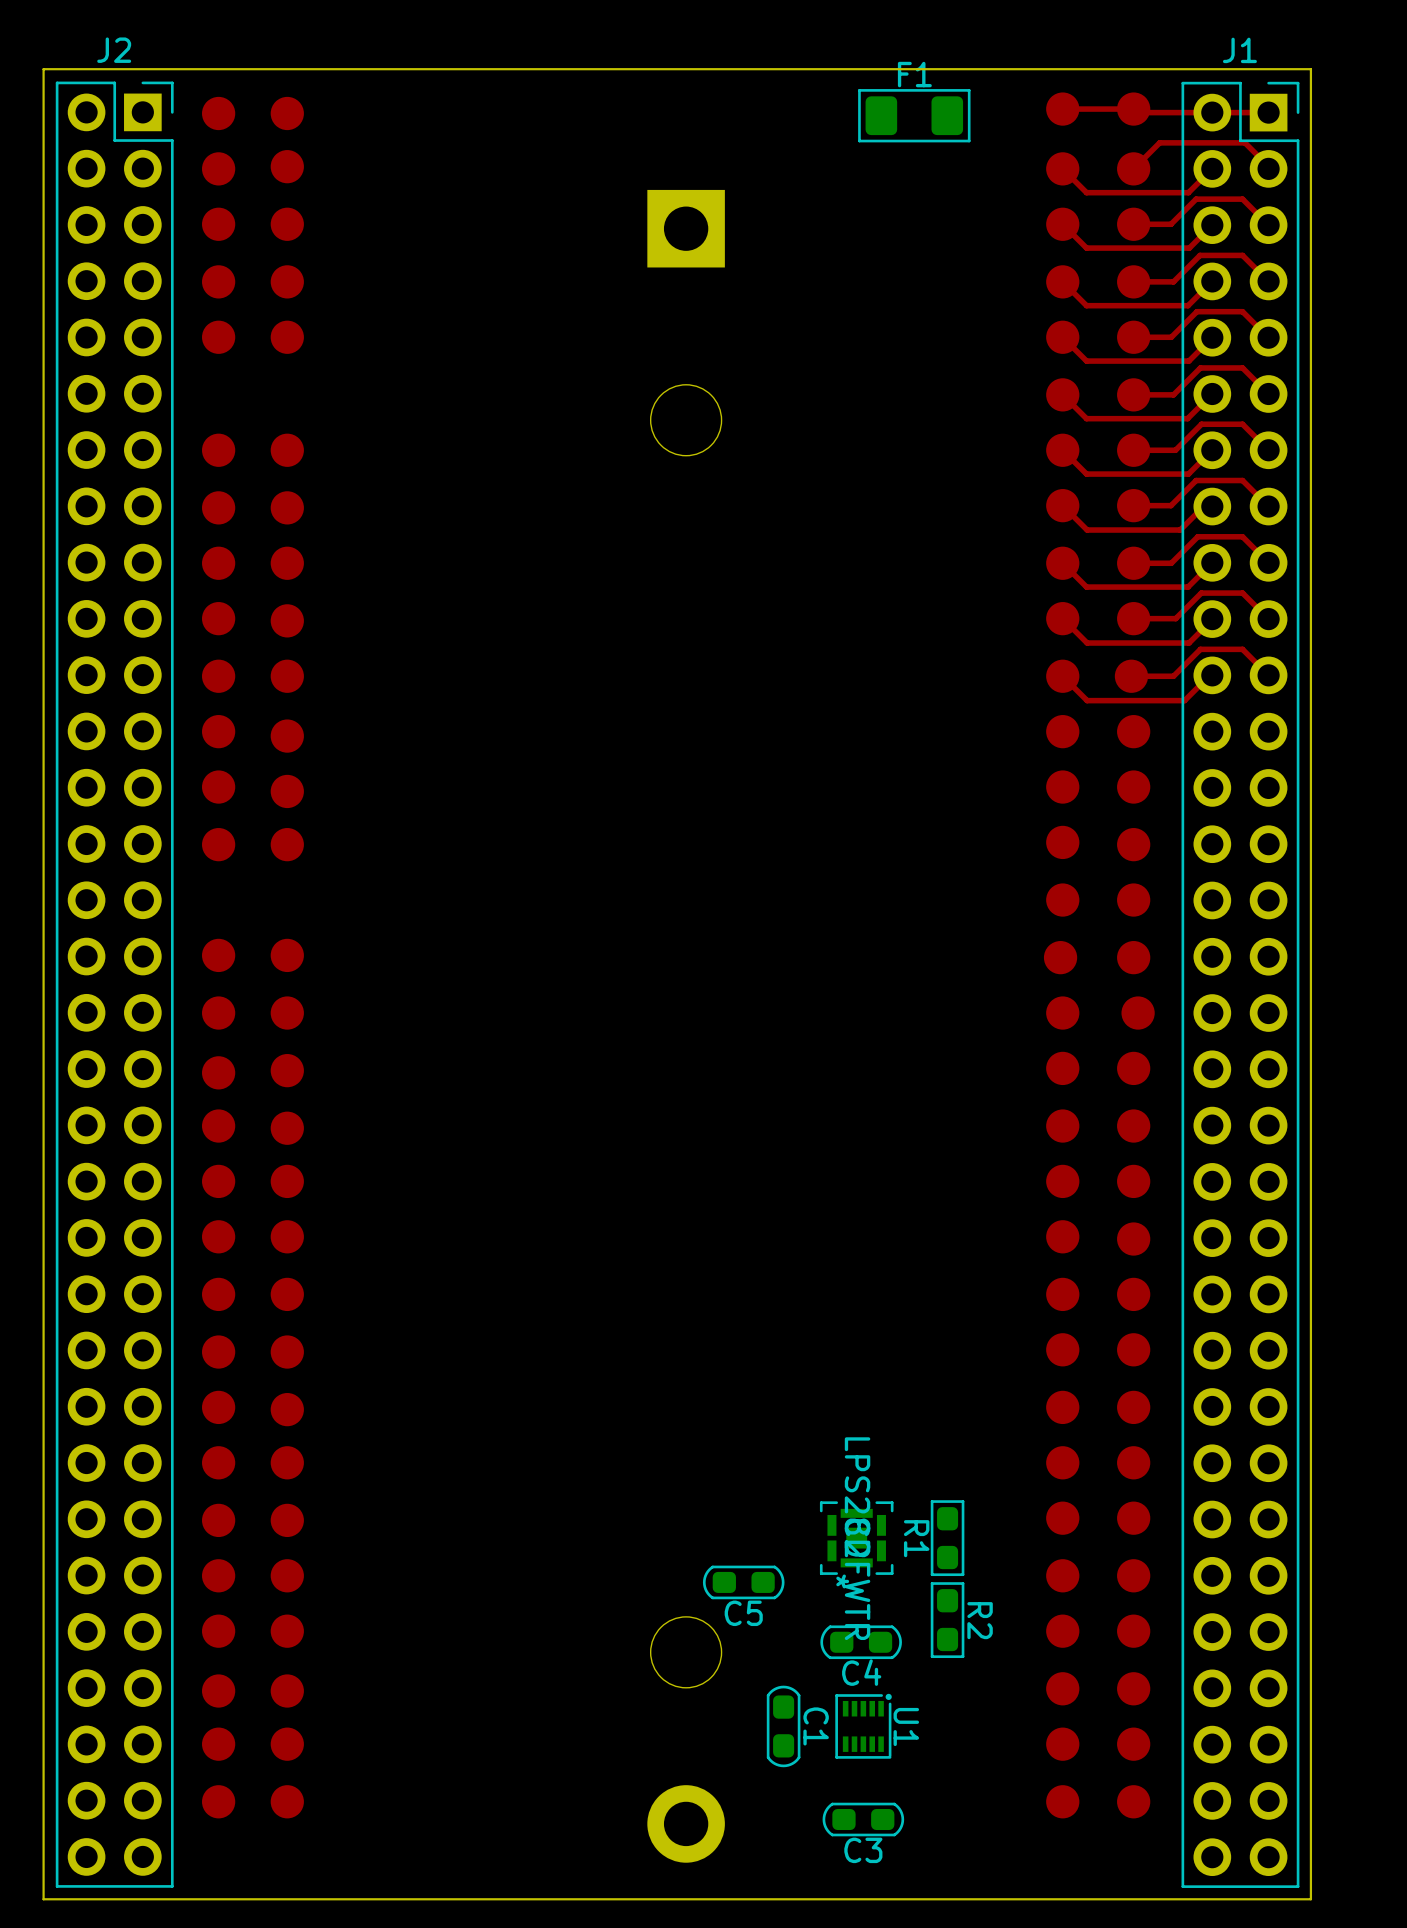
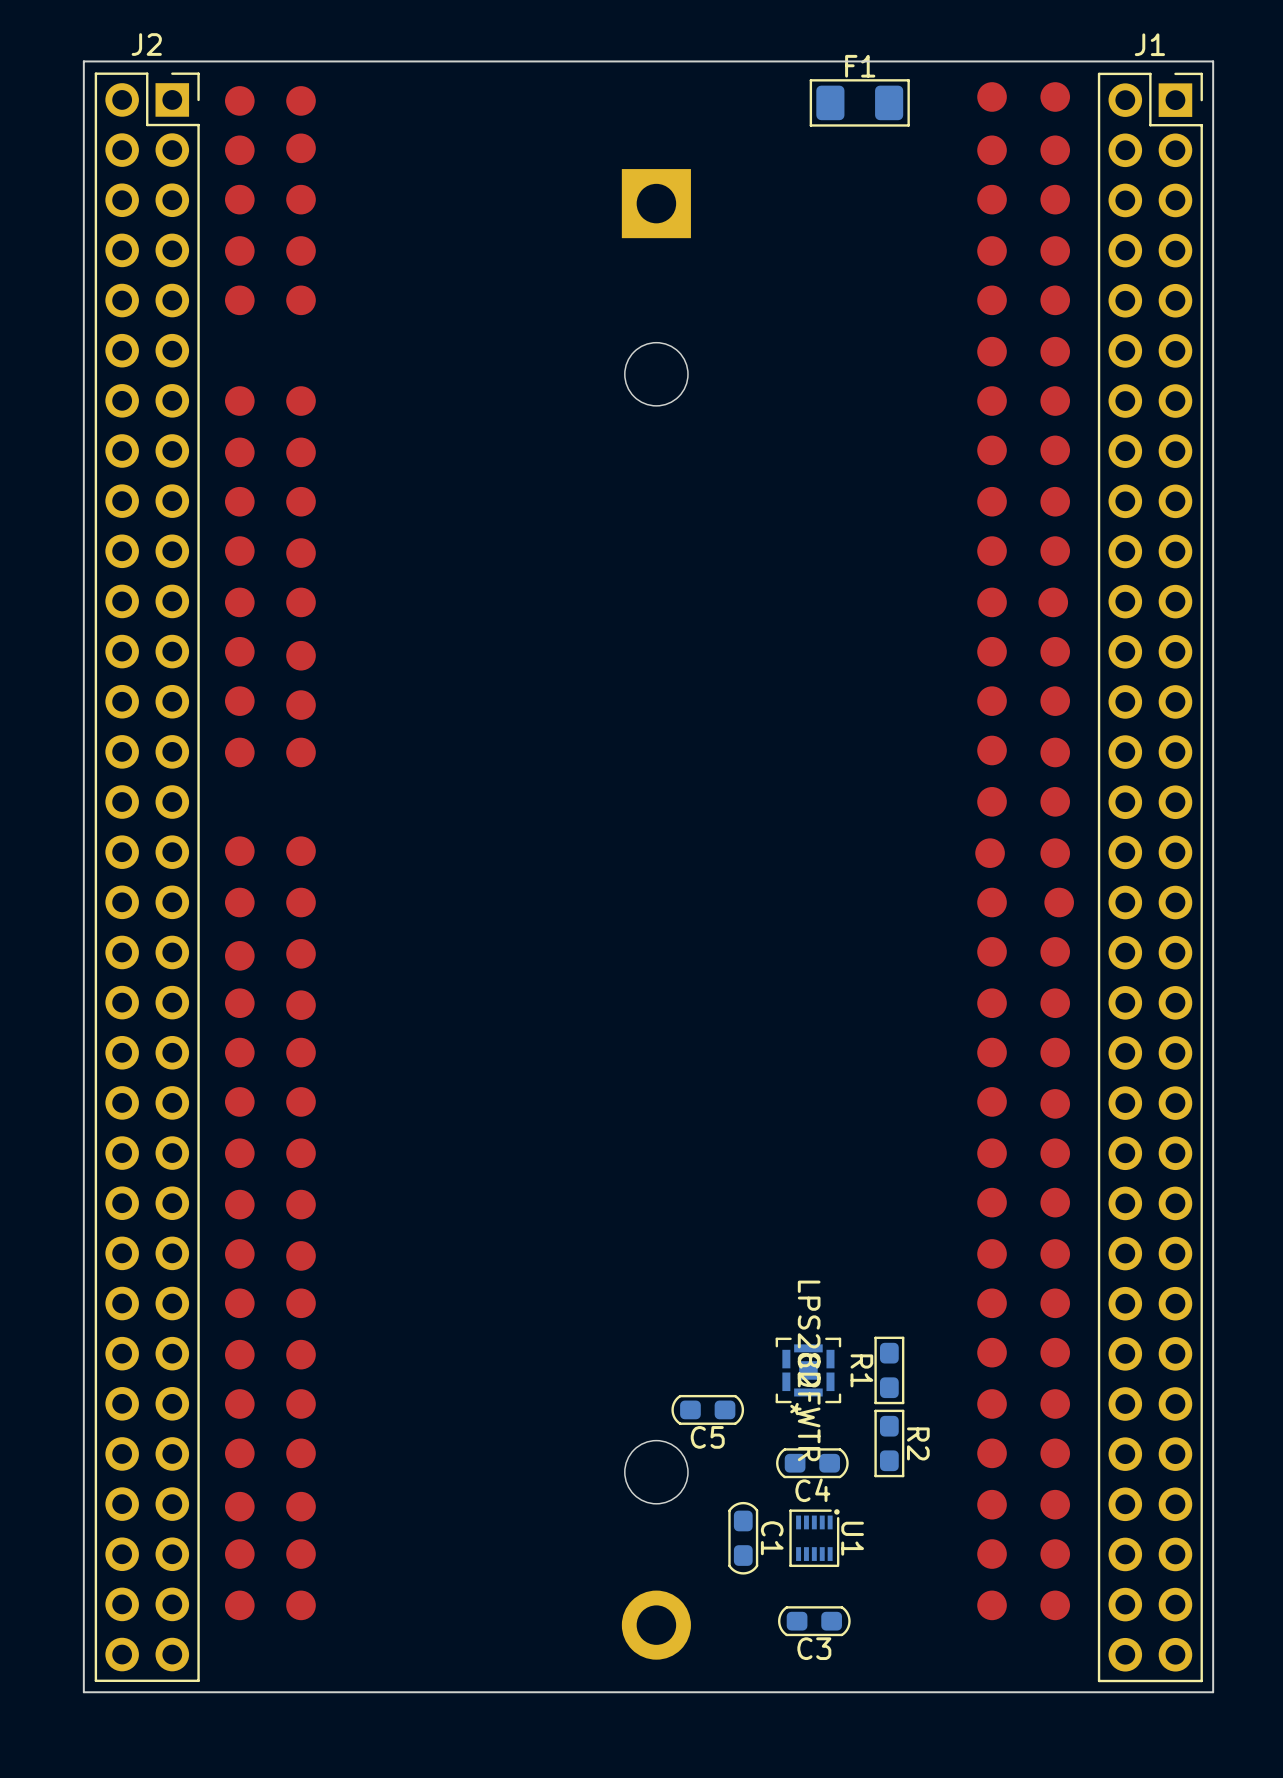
top track: (1062, 109) (1133, 109) (1137, 112) (1268, 112) -> none
top track: (1212, 168) (1188, 192) (1086, 192) (1062, 168) -> none
top track: (1268, 168) (1268, 166) (1245, 142) (1159, 142) (1133, 168) -> none
top track: (1062, 224) (1086, 248) (1189, 248) (1212, 225) -> none
top track: (1133, 224) (1171, 224) (1196, 199) (1242, 199) (1268, 225) -> none
top track: (1212, 281) (1188, 305) (1086, 305) (1062, 281) -> none
top track: (1268, 281) (1242, 255) (1200, 255) (1173, 281) (1133, 281) -> none
top track: (1062, 337) (1086, 361) (1188, 361) (1212, 337) -> none
top track: (1133, 337) (1171, 337) (1196, 311) (1242, 311) (1268, 337) -> none
top track: (1212, 393) (1187, 418) (1086, 418) (1062, 394) -> none
top track: (1268, 393) (1242, 367) (1200, 367) (1173, 394) (1133, 394) -> none
top track: (1212, 450) (1188, 474) (1086, 474) (1062, 450) -> none
top track: (1268, 450) (1242, 424) (1201, 424) (1175, 450) (1133, 450) -> none
top track: (1062, 505) (1087, 530) (1180, 530) (1203, 506) (1212, 506) -> none
top track: (1133, 505) (1171, 505) (1196, 480) (1242, 480) (1268, 506) -> none
top track: (1212, 562) (1188, 587) (1086, 587) (1062, 563) -> none
top track: (1268, 562) (1242, 536) (1197, 536) (1171, 563) (1133, 563) -> none
top track: (1062, 618) (1087, 643) (1189, 643) (1212, 619) -> none
top track: (1133, 618) (1175, 618) (1201, 593) (1242, 593) (1268, 619) -> none
top track: (1212, 675) (1209, 675) (1184, 700) (1087, 700) (1062, 676) -> none
top track: (1268, 675) (1242, 649) (1200, 649) (1173, 676) (1131, 676) -> none

